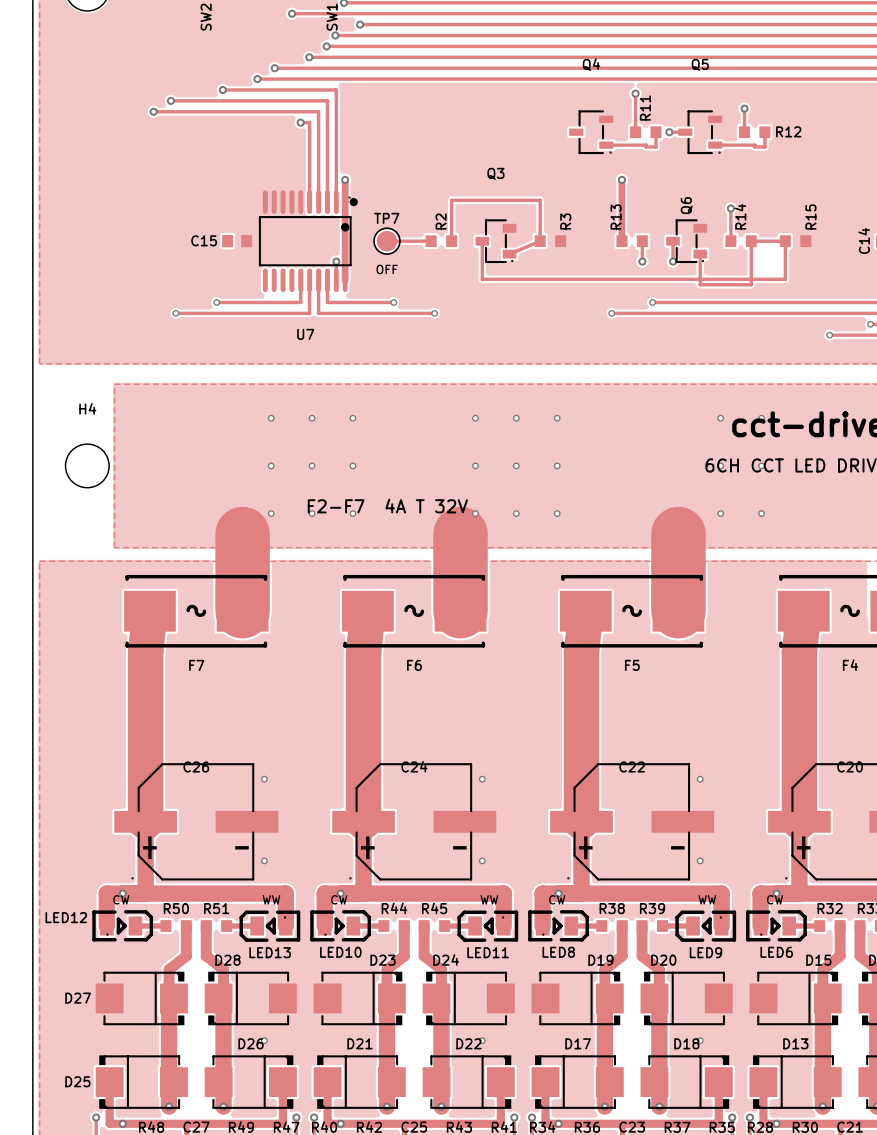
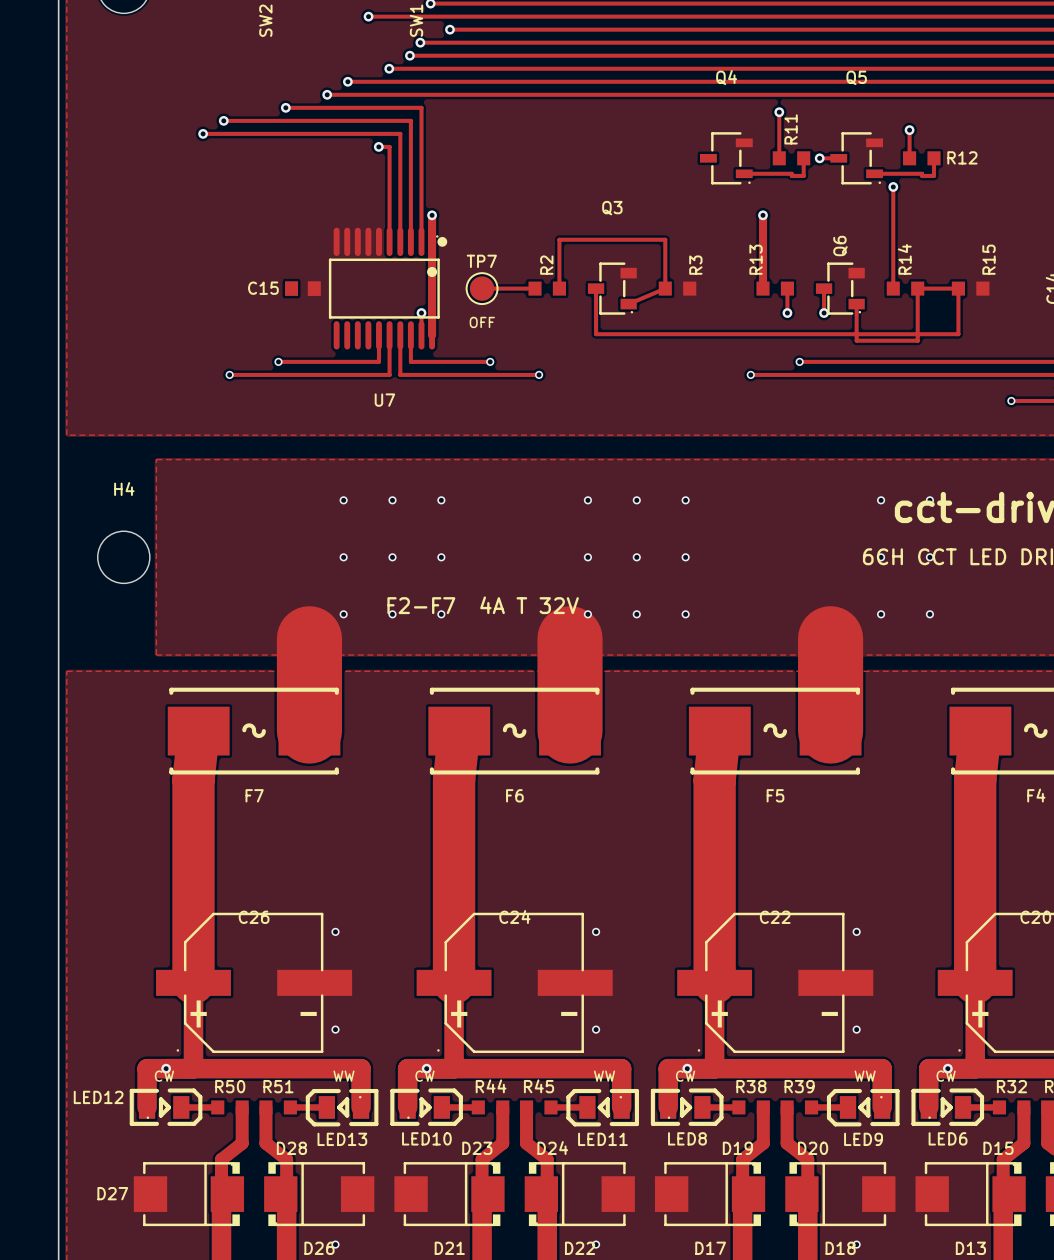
track: none -> (893, 186) (893, 249)
via position: (730, 208) -> (893, 186)

